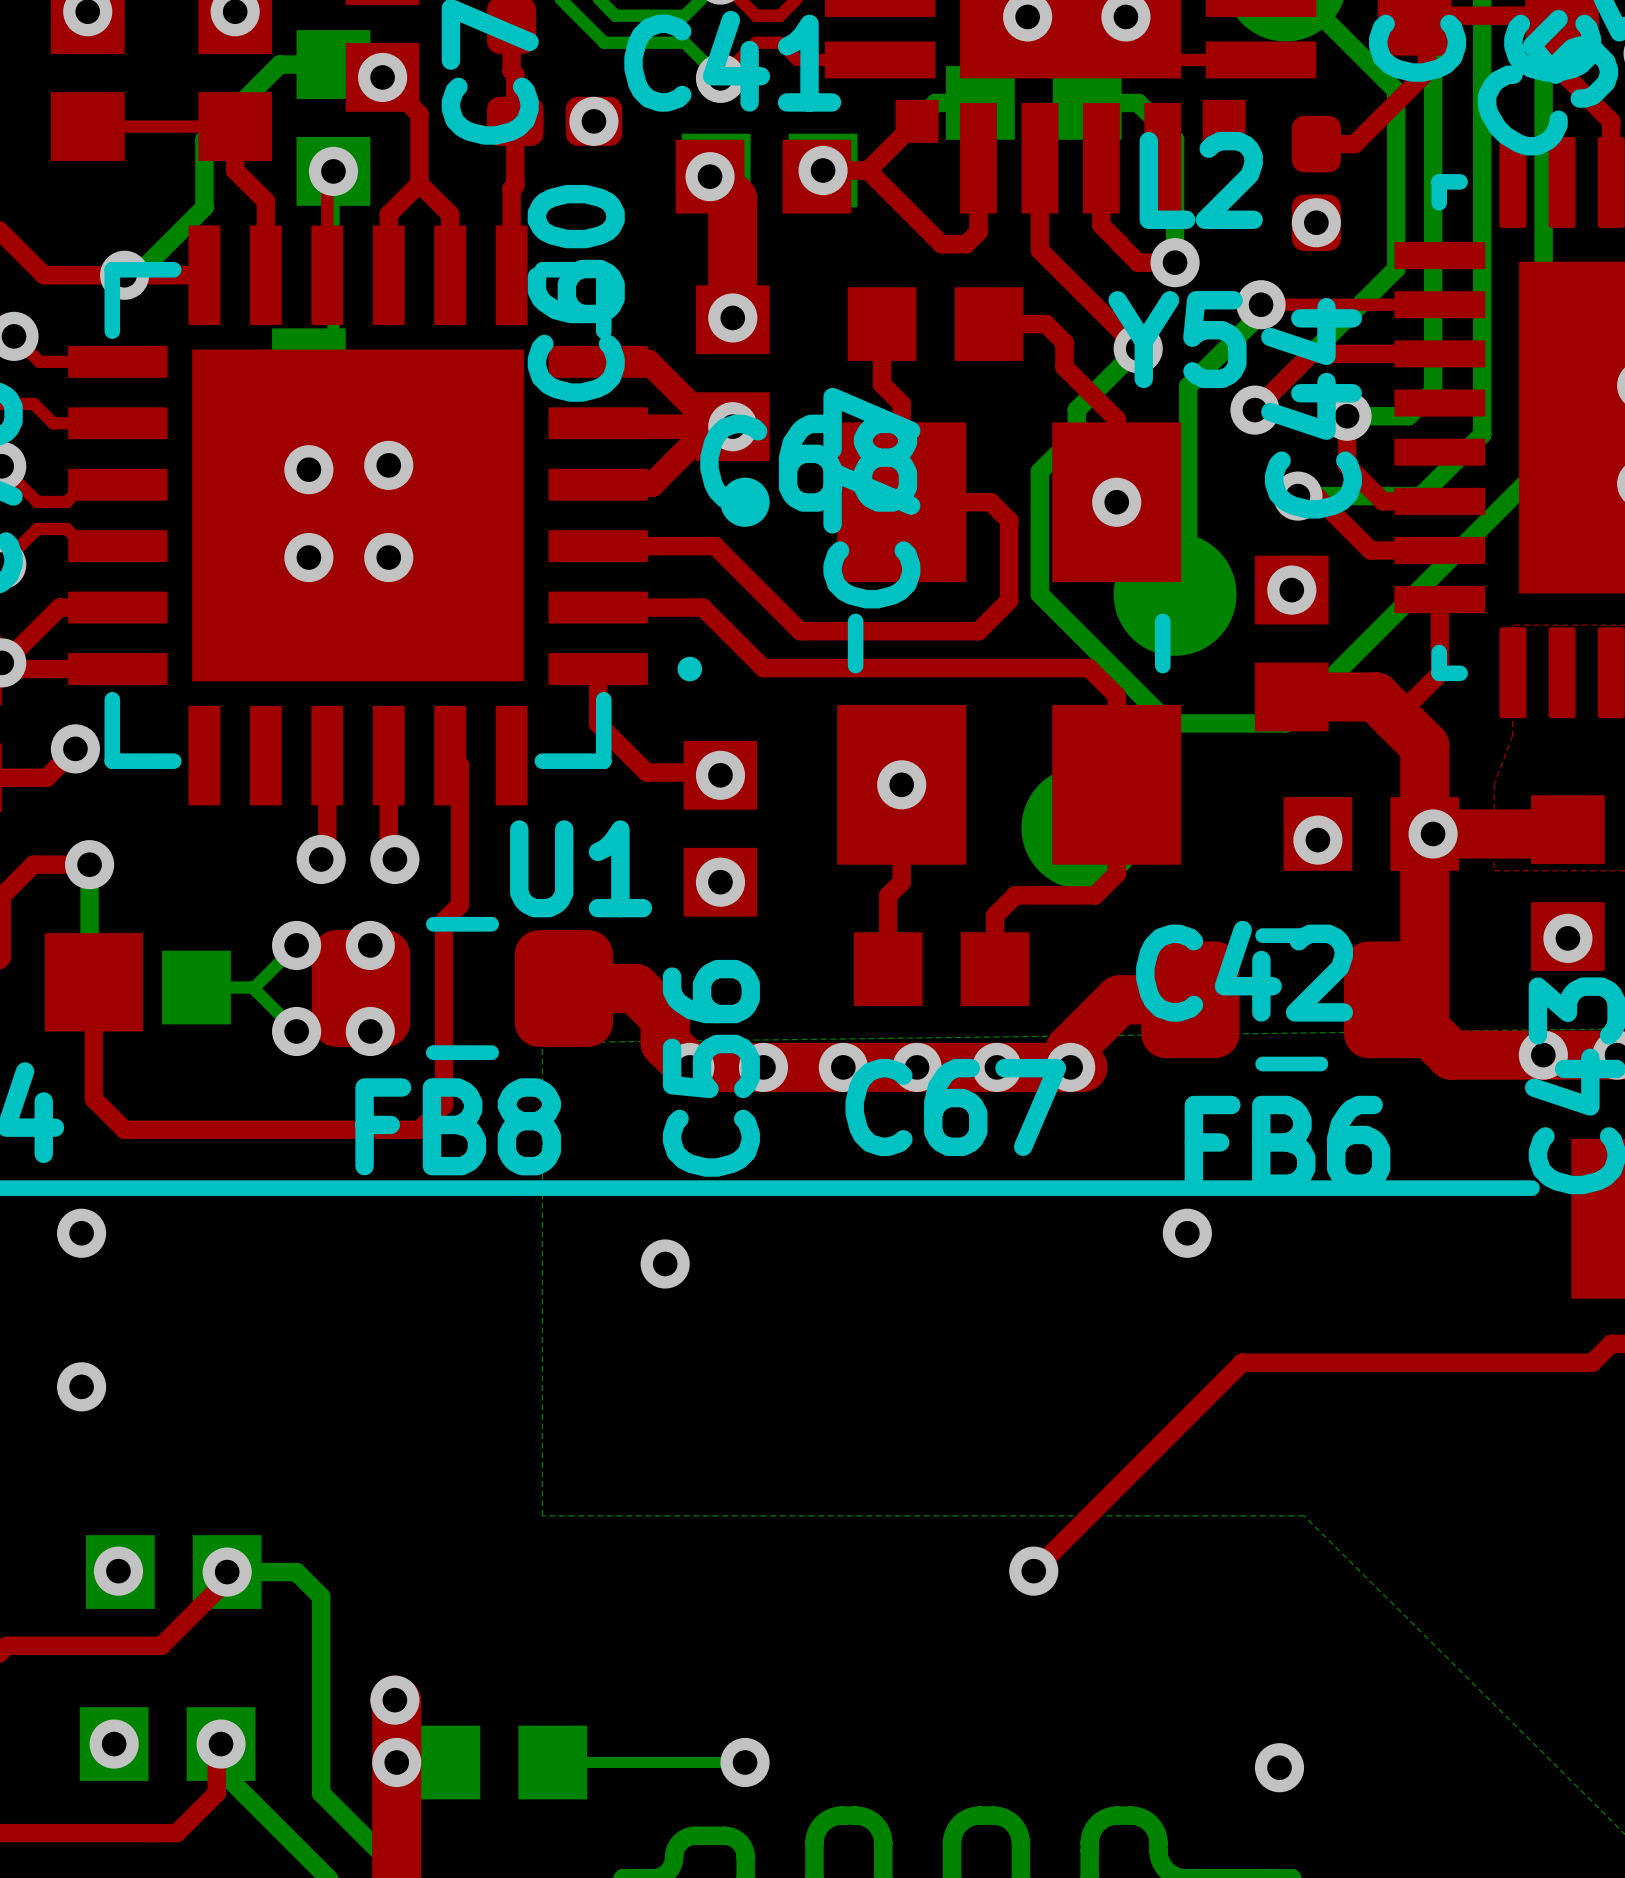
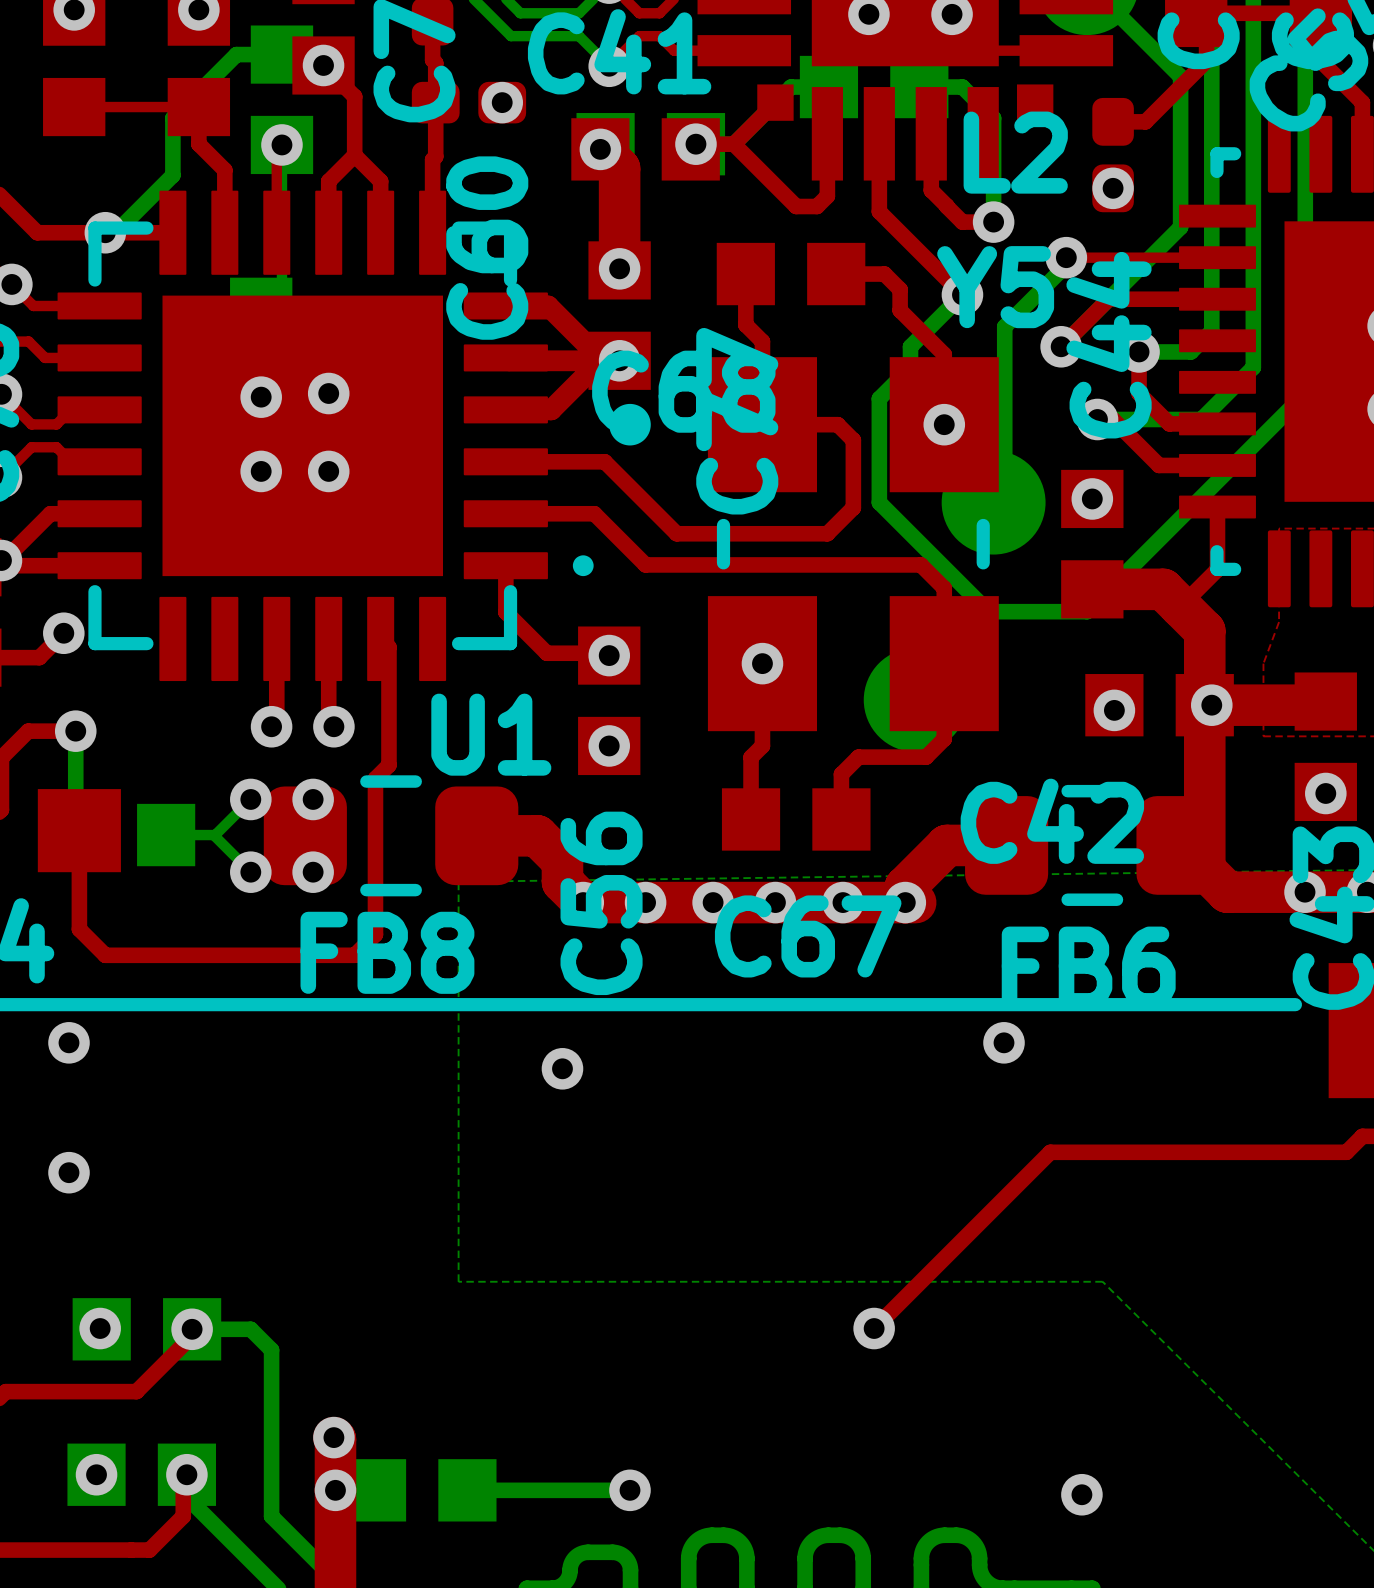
bottom track width: thin (552, 1762) (745, 1762) -> thick (467, 1490) (630, 1490)

